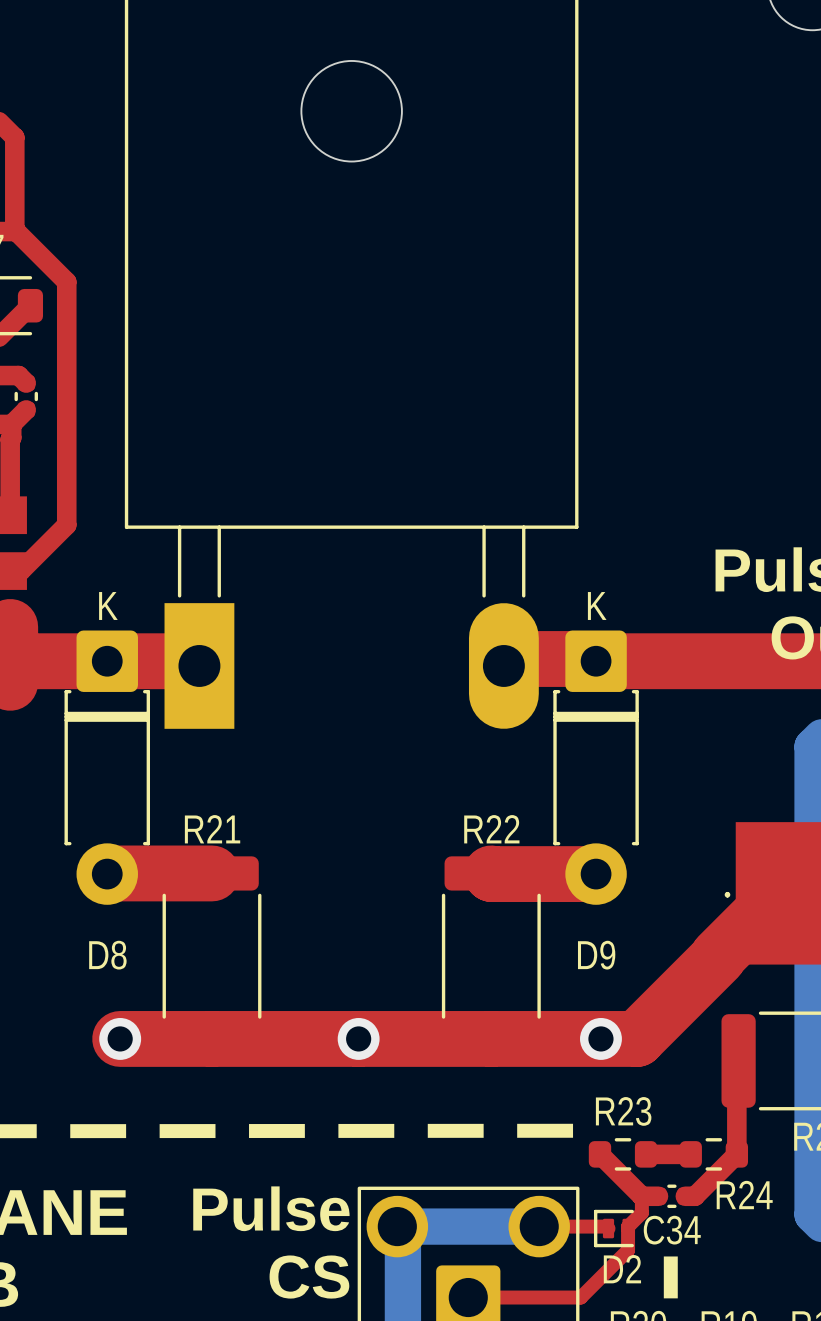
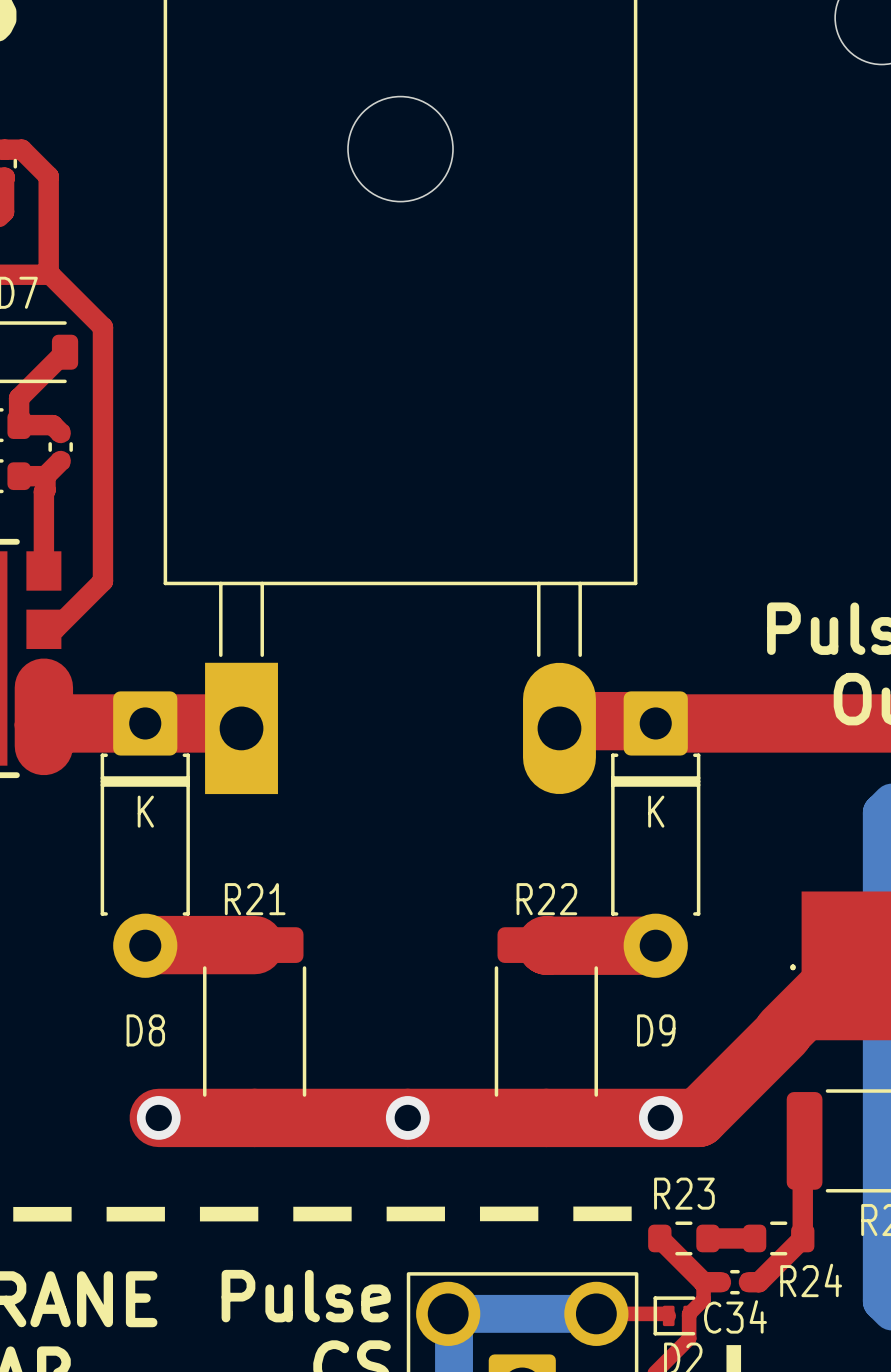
D8 text position: K (108, 606) -> K (145, 811)
D9 text position: K (597, 606) -> K (656, 811)

